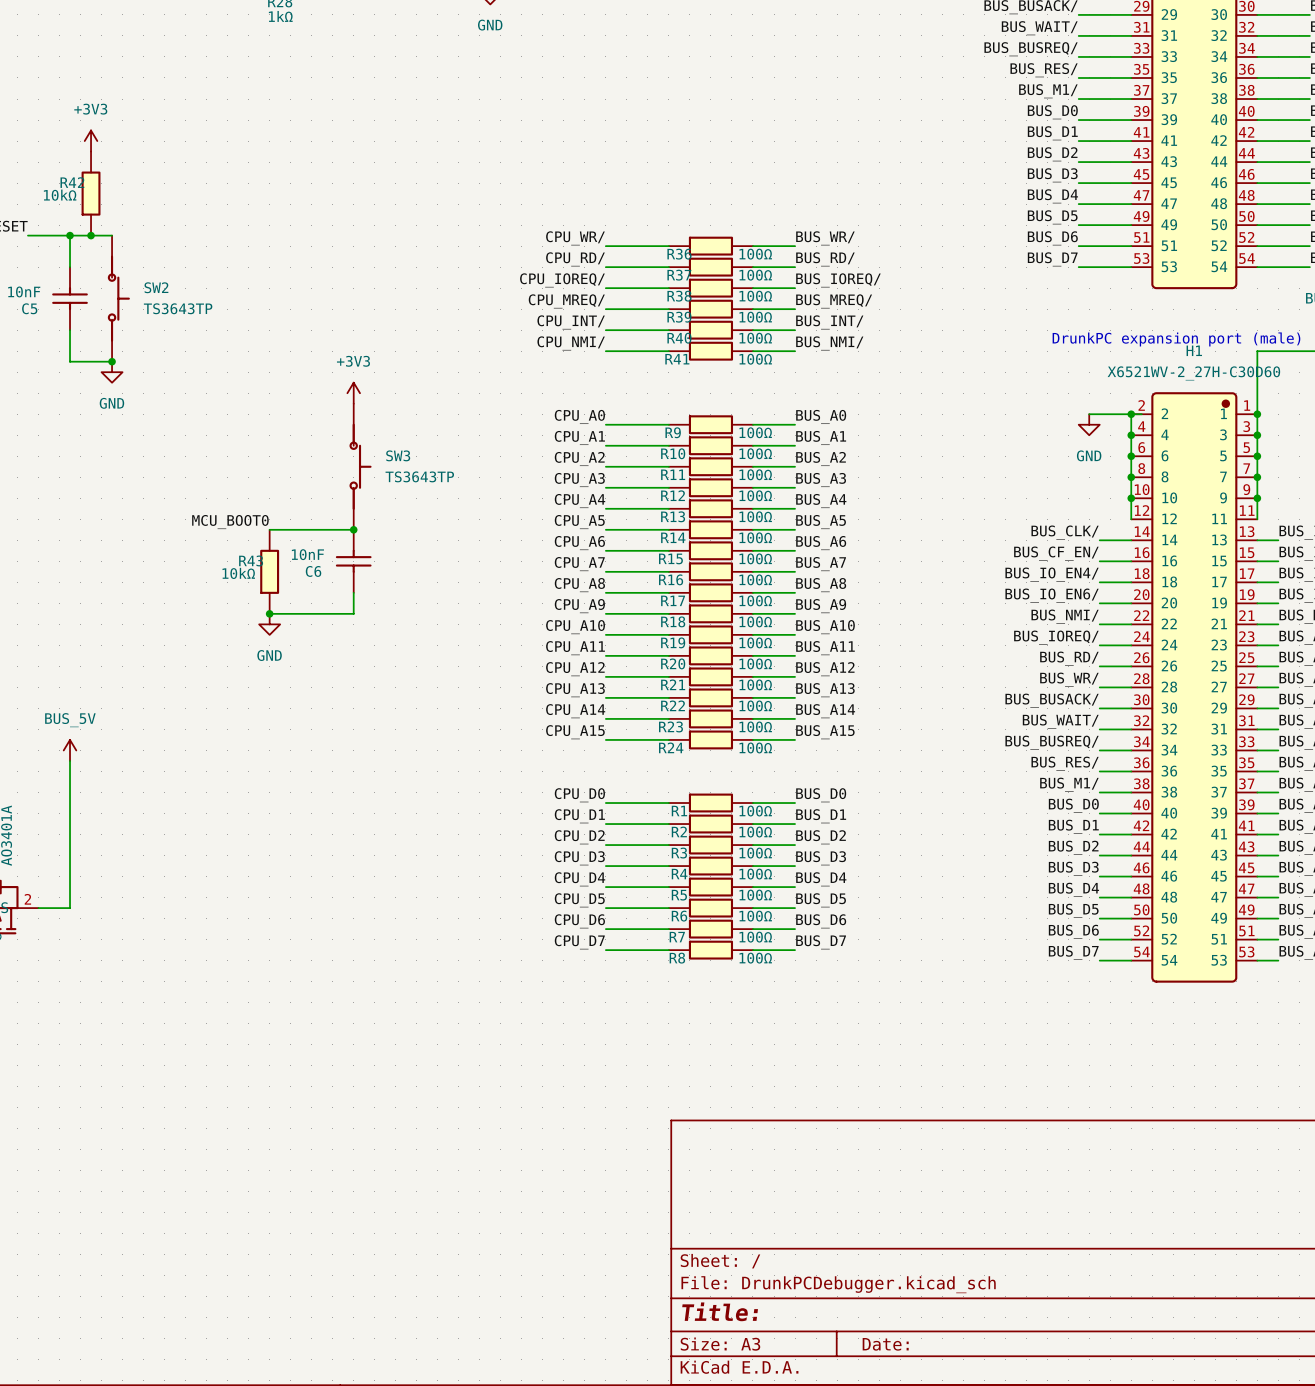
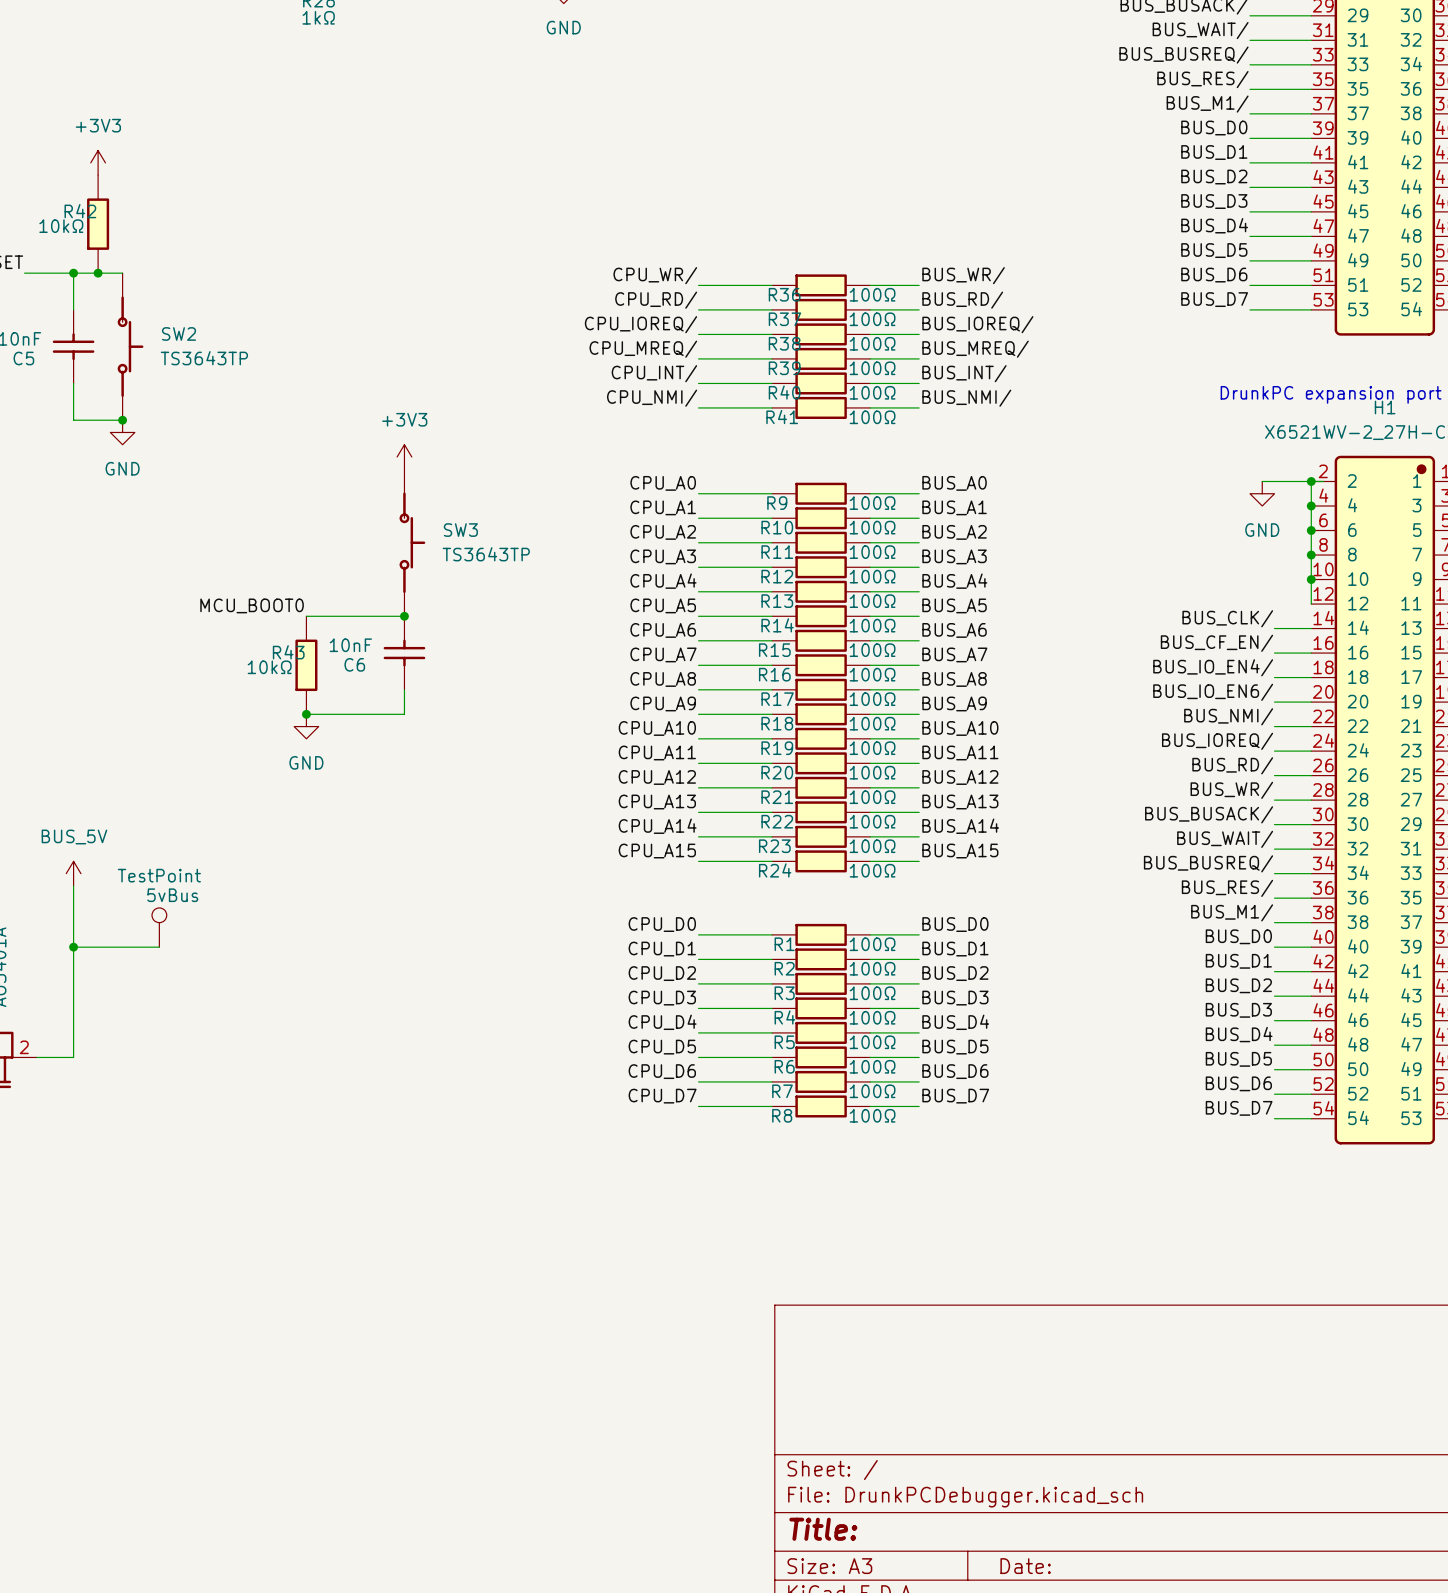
part: none -> 5vBus (159, 927)
wire: none -> (73, 947) (159, 947)
junction: none -> (73, 947)

